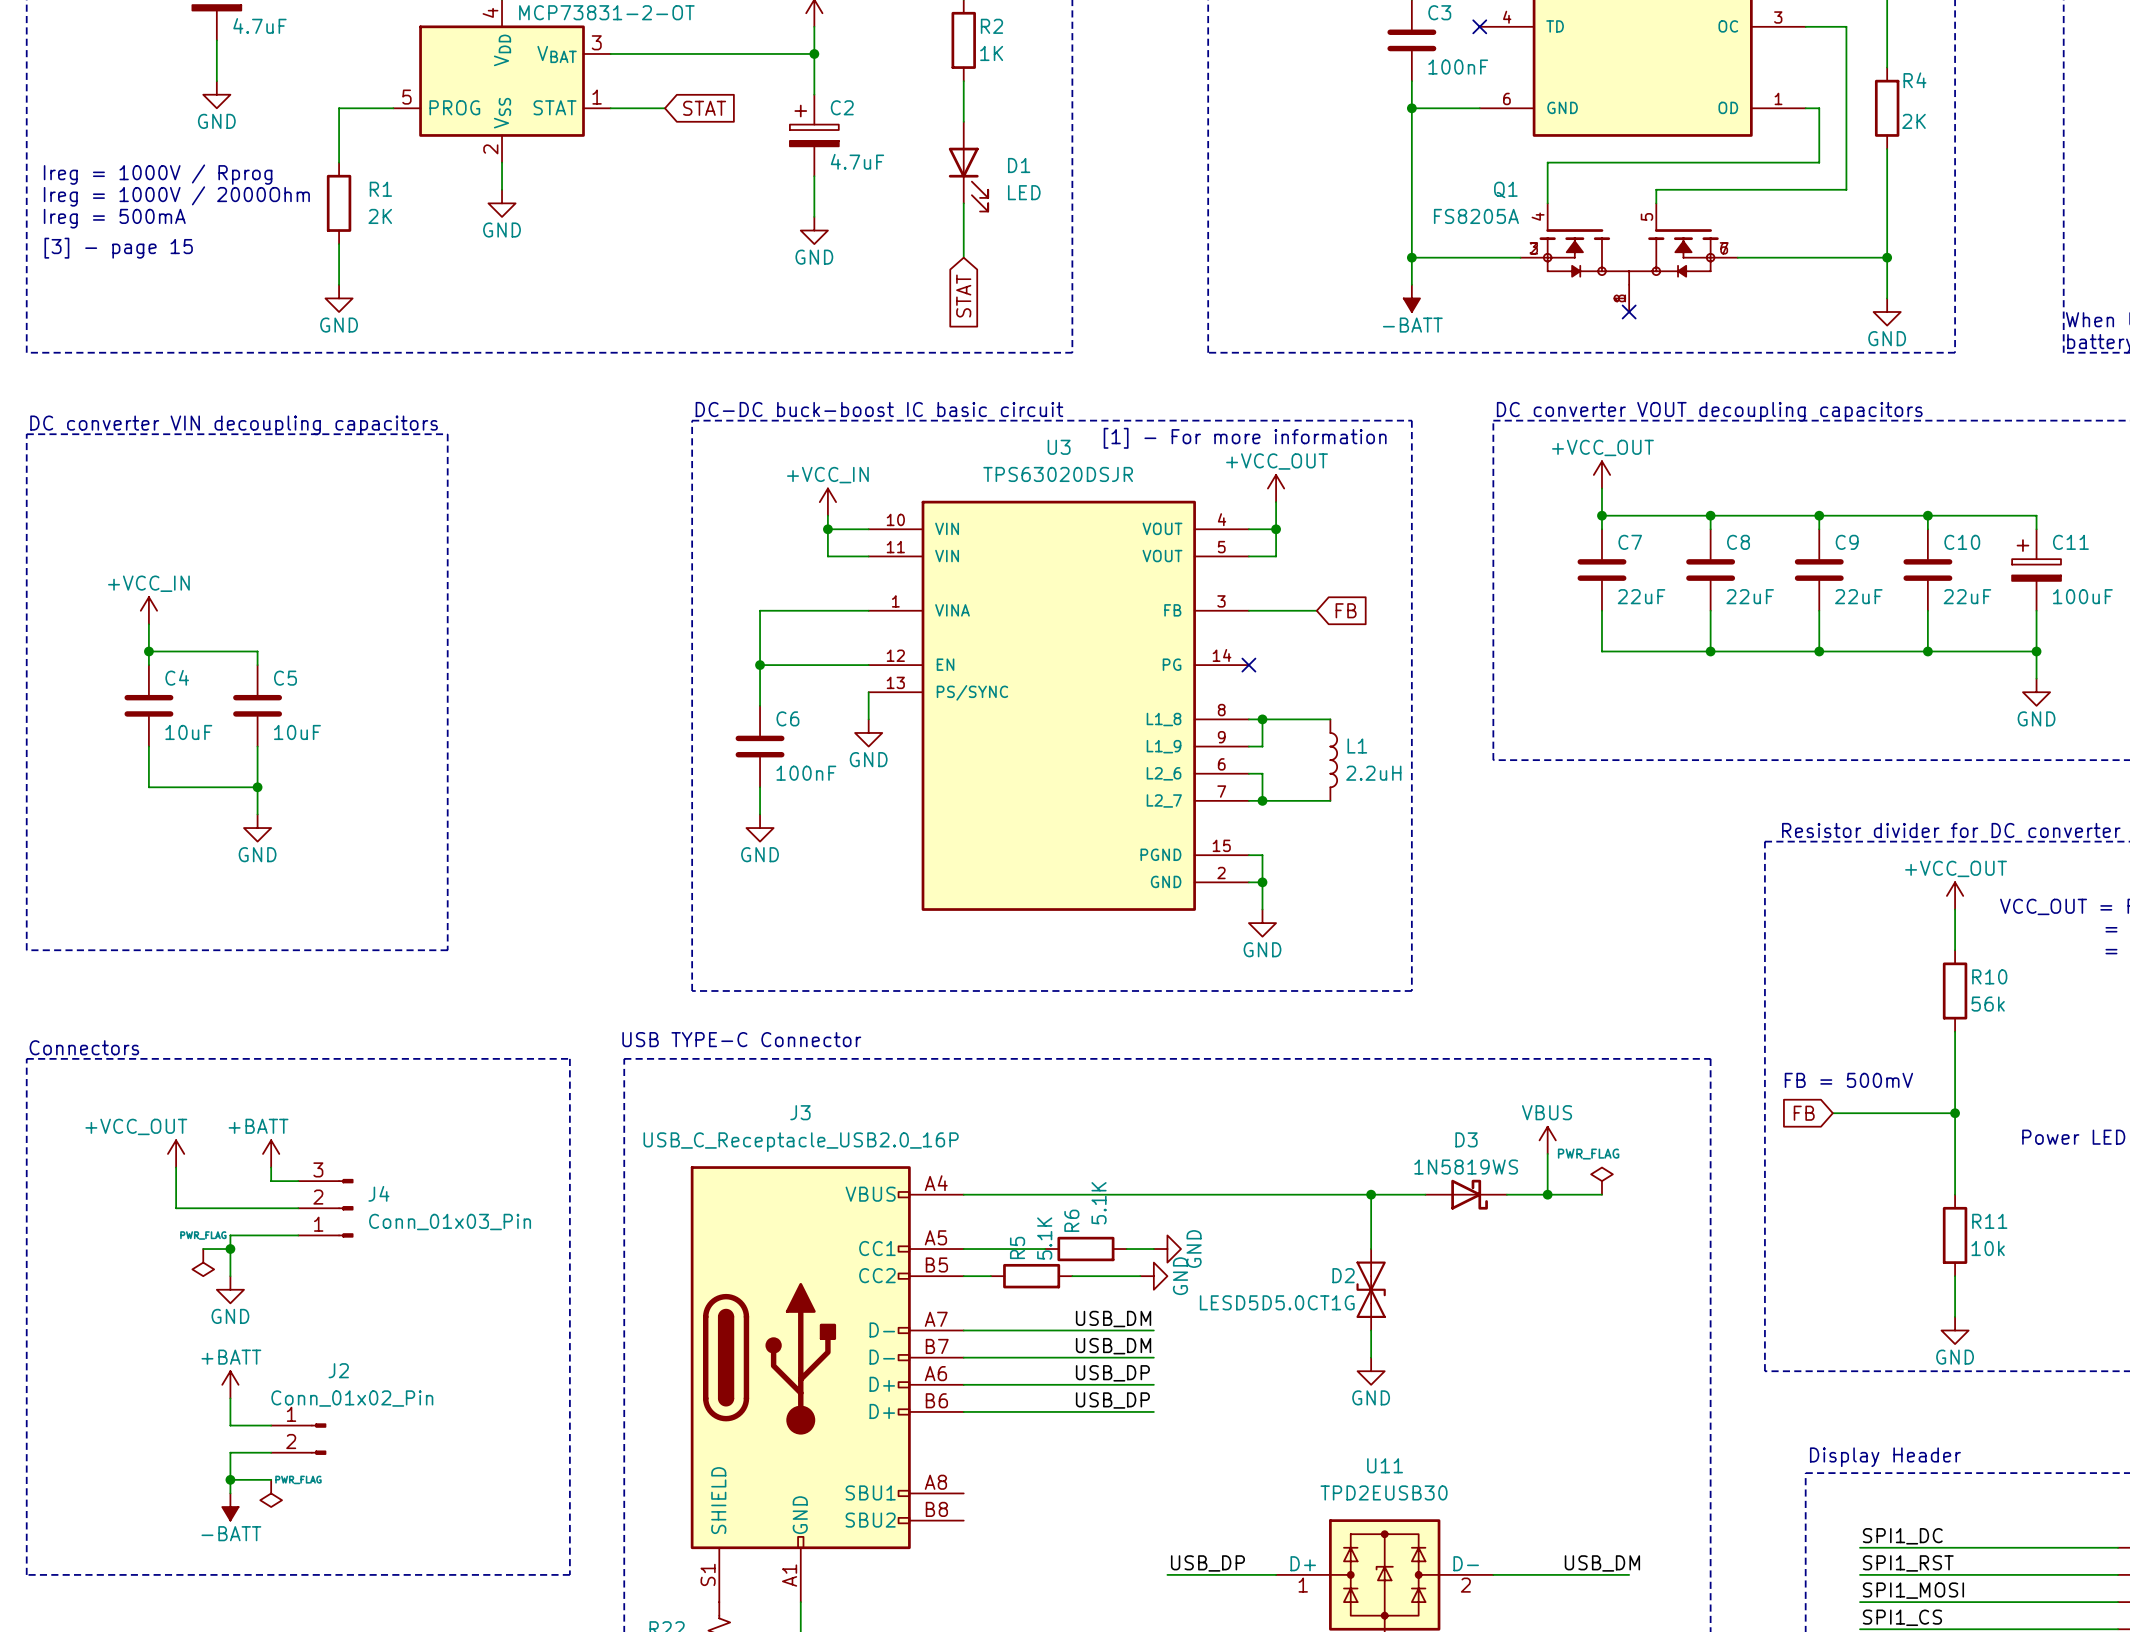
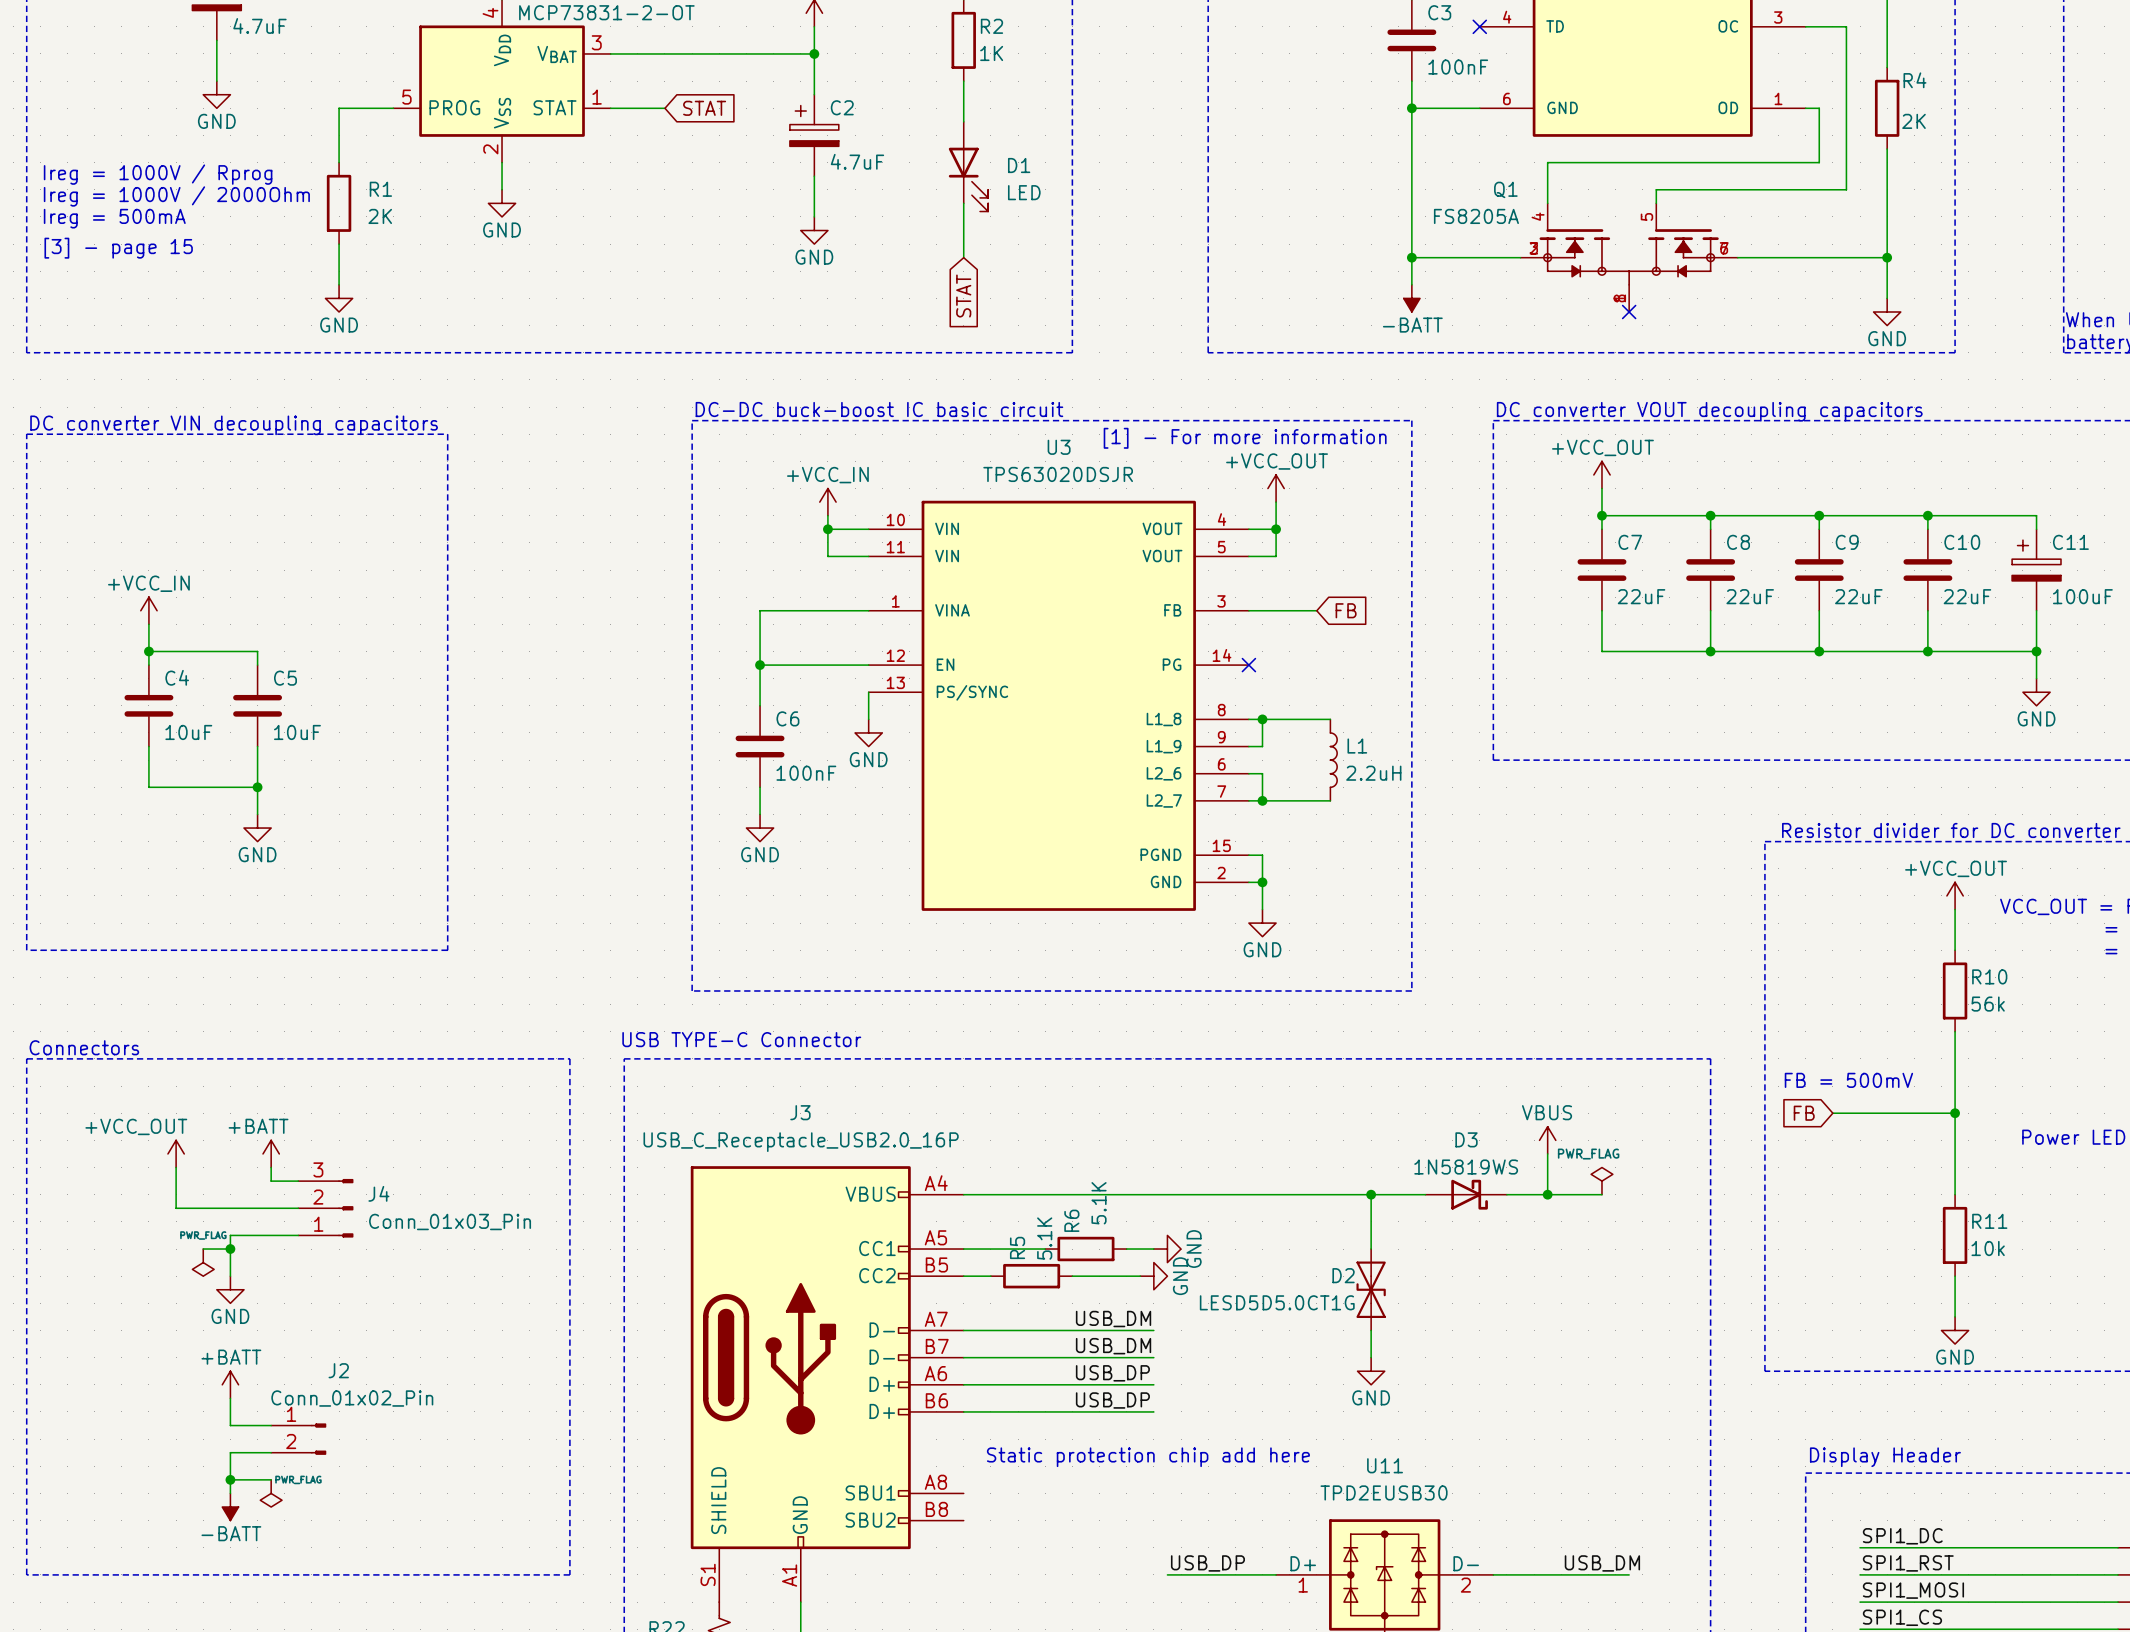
text: none -> Static protection chip add here (1148, 1457)

